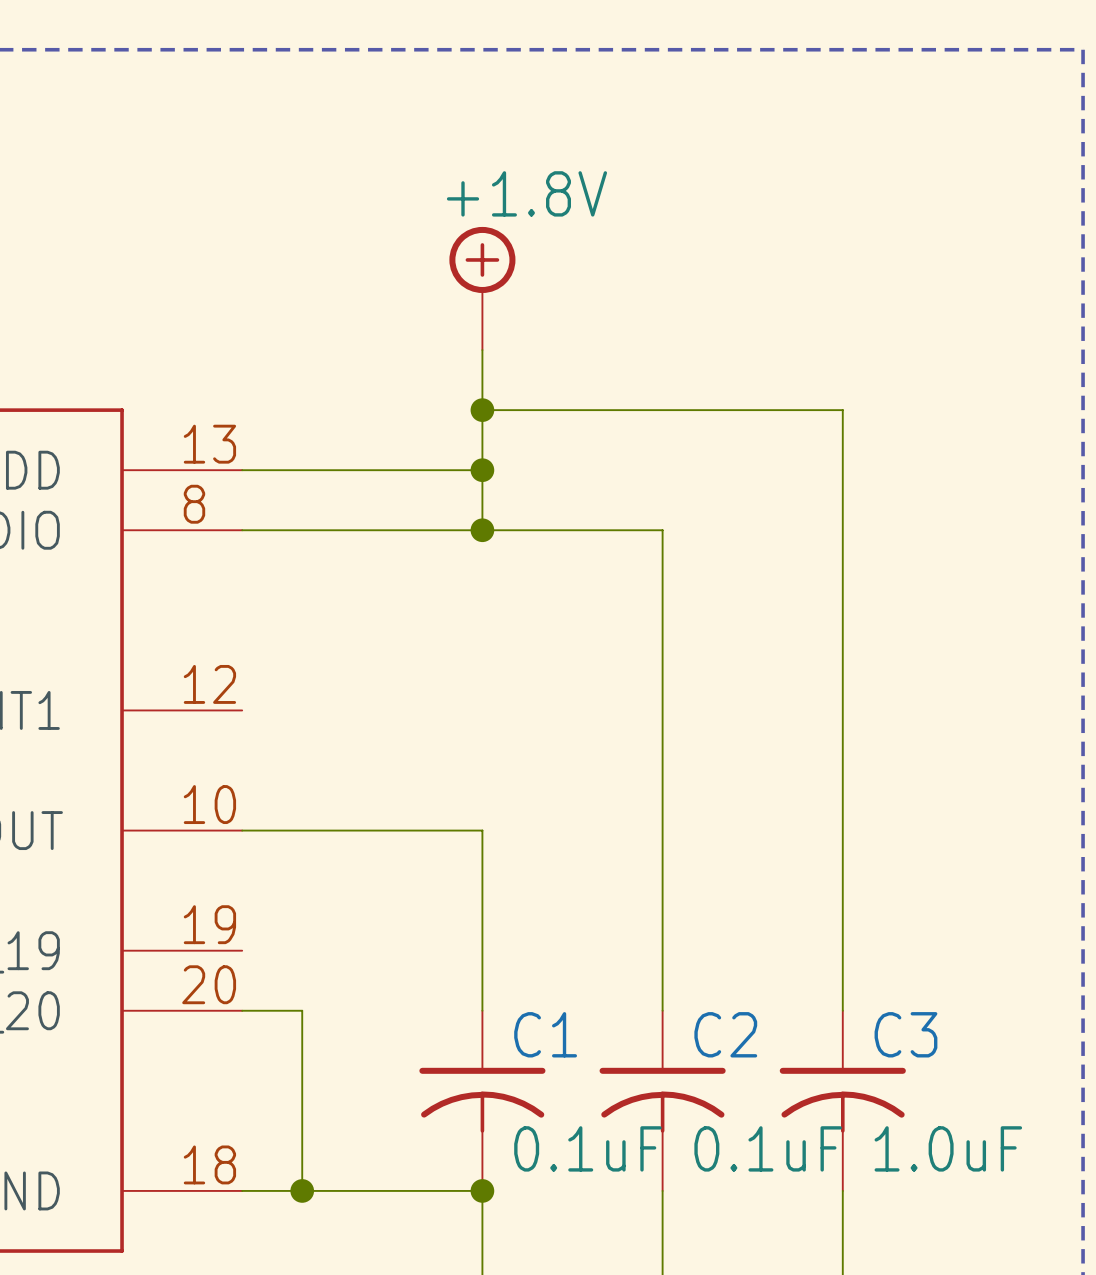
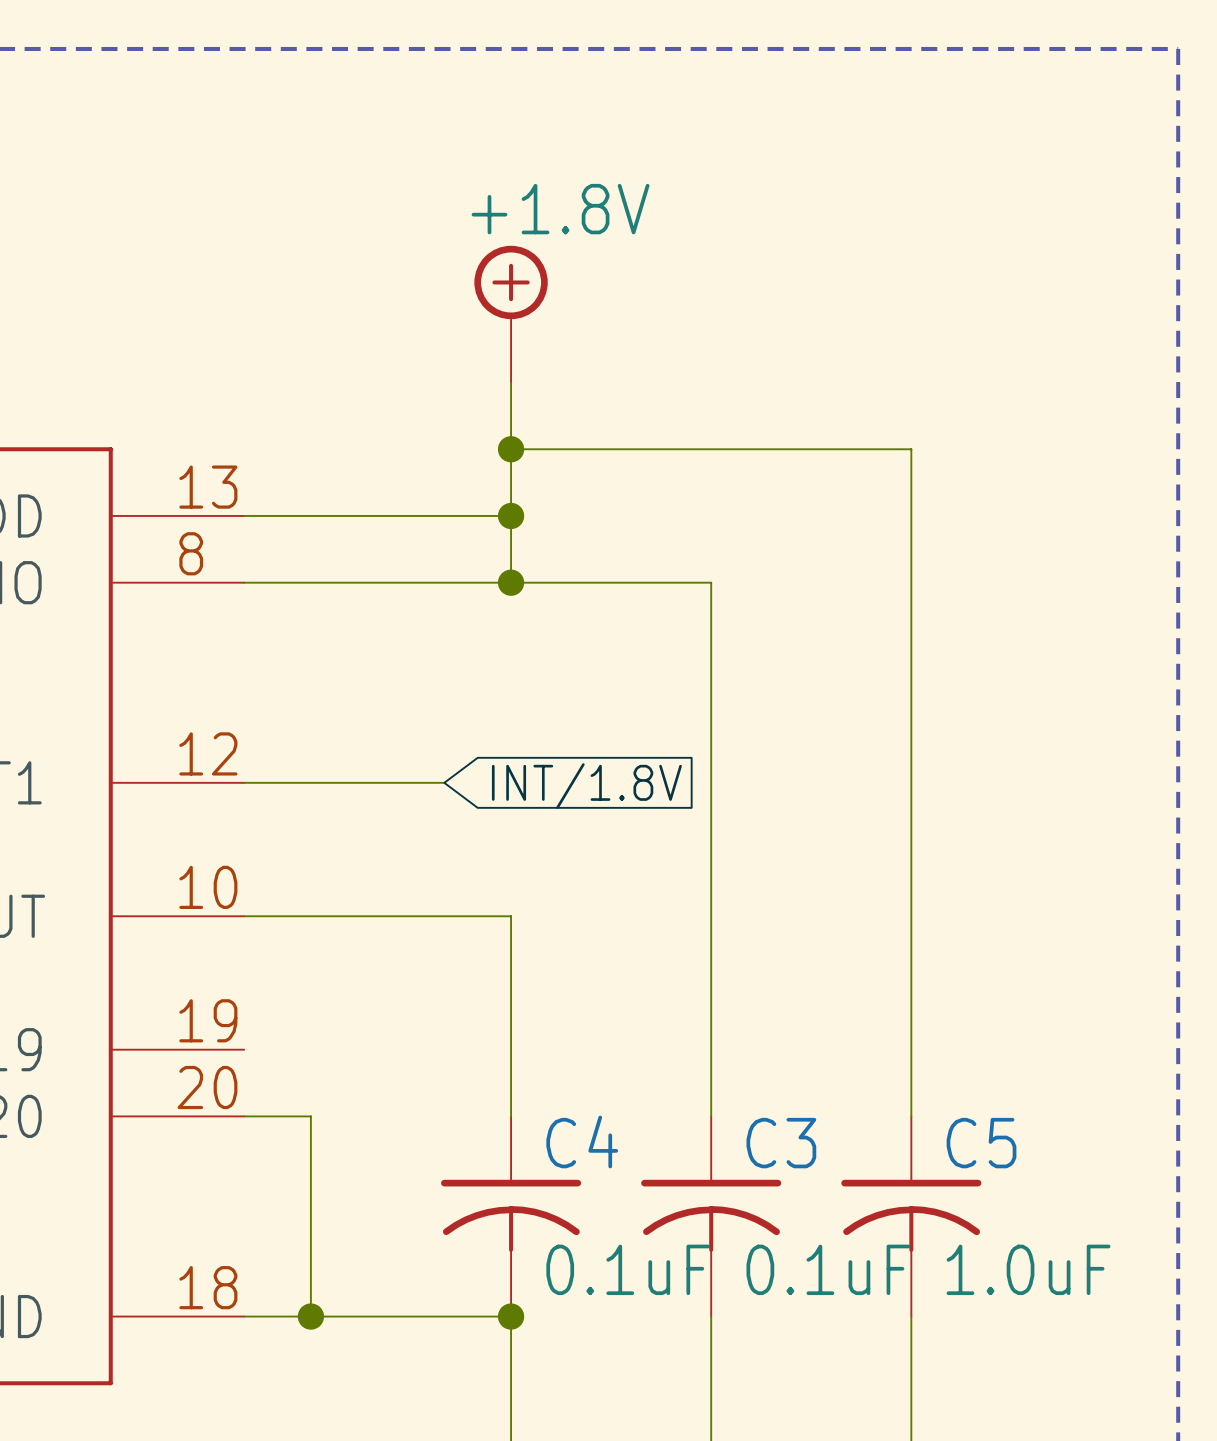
wire: none -> (244, 782) (444, 782)
global label: none -> INT/1.8V (586, 786)
C1 name: C1 (545, 1034) -> C4 (582, 1141)
C2 name: C2 (725, 1034) -> C3 (781, 1143)
C3 name: C3 (905, 1034) -> C5 (981, 1143)

